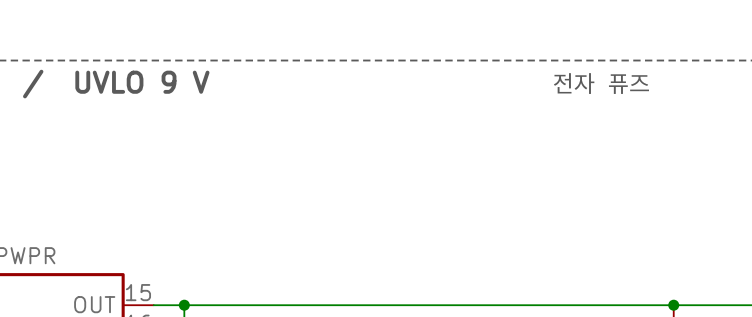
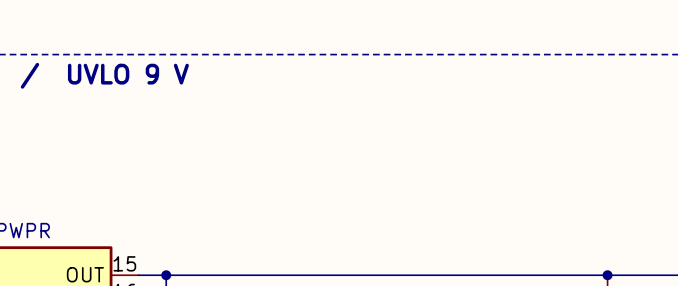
text: 전자 퓨즈 (601, 83) -> none

